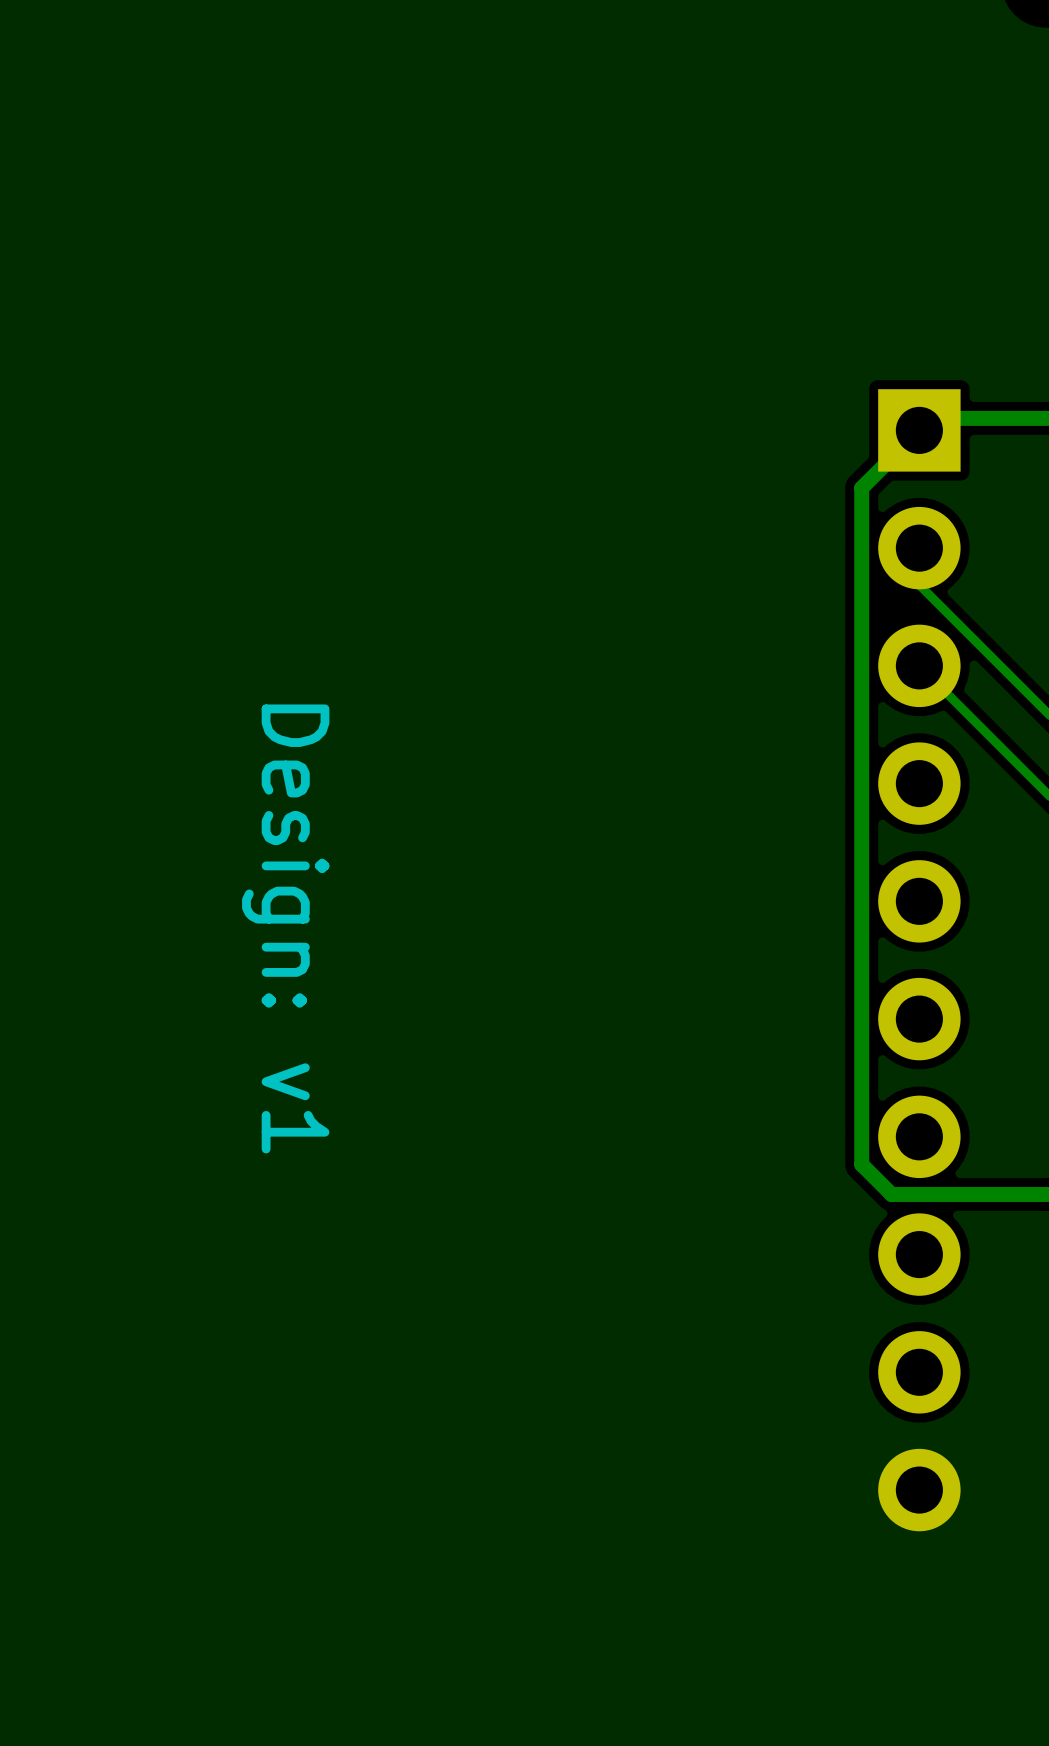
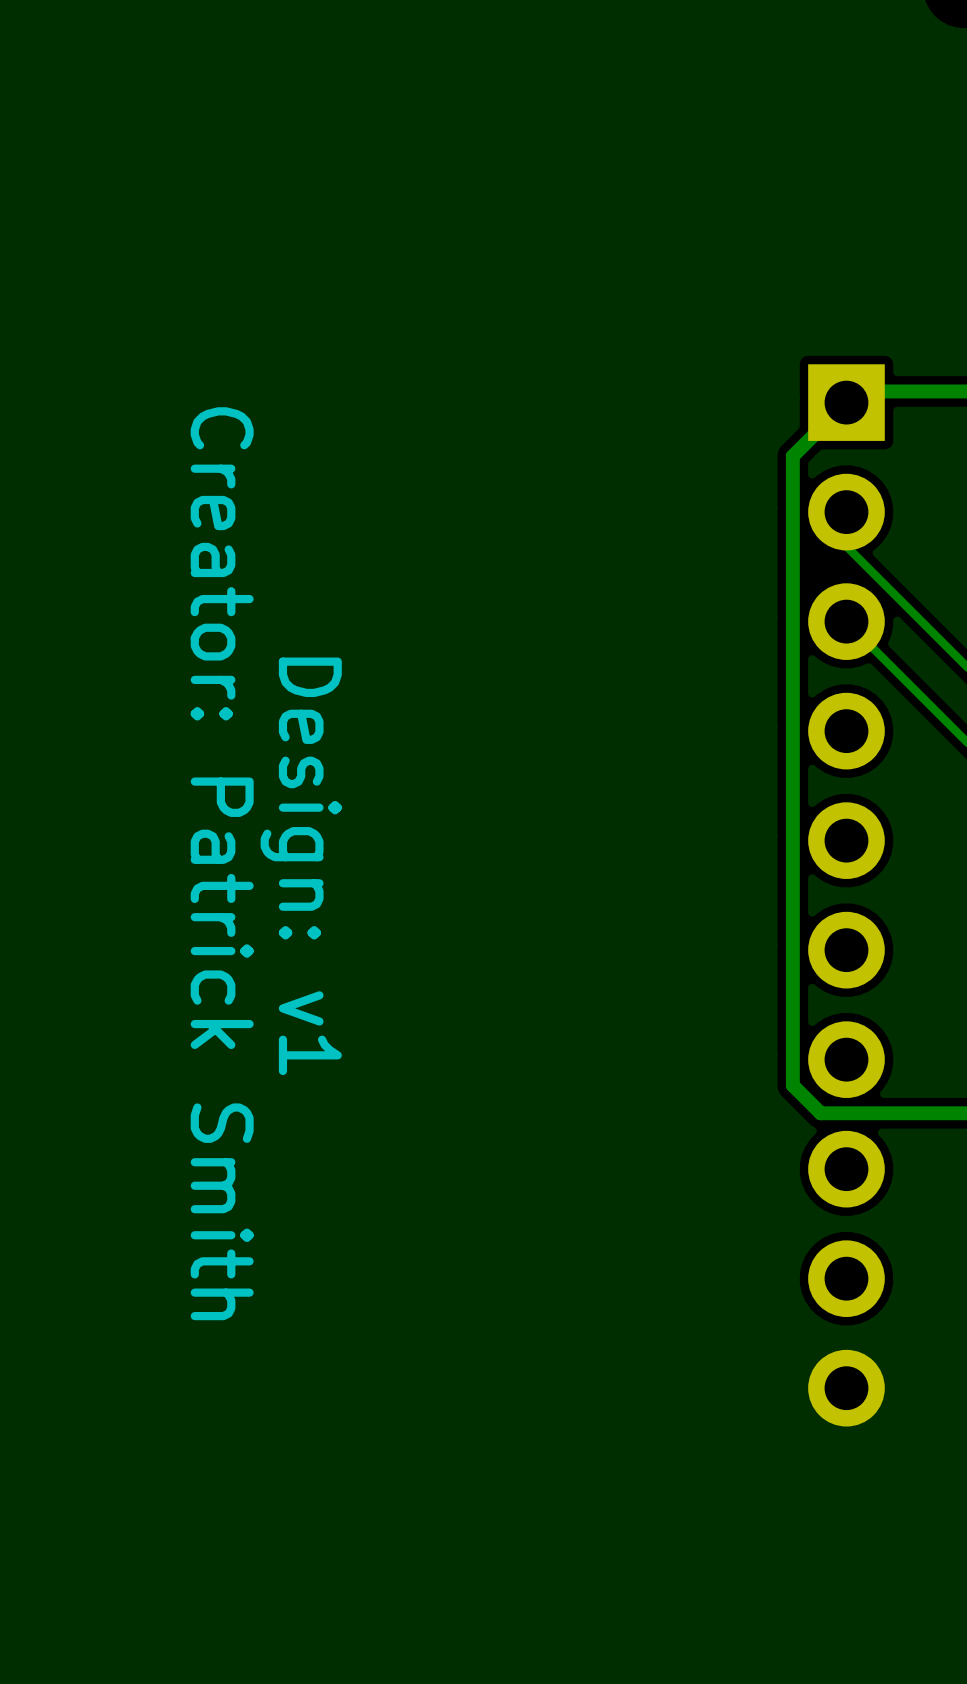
text: none -> Creator: Patrick Smith (222, 863)
text position: Design: v1 (285, 928) -> Design: v1 (301, 866)

